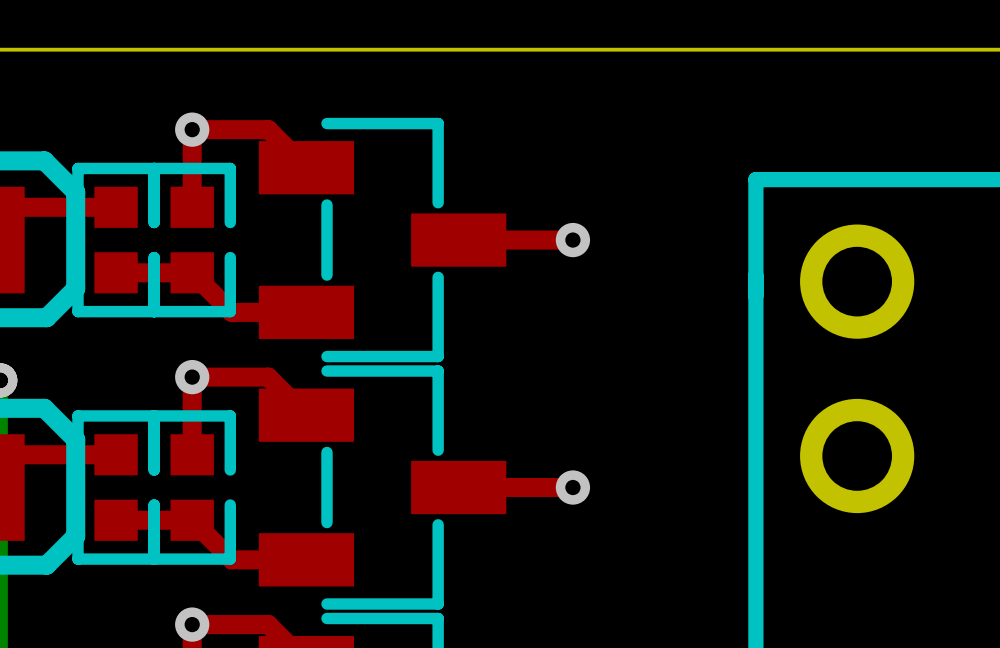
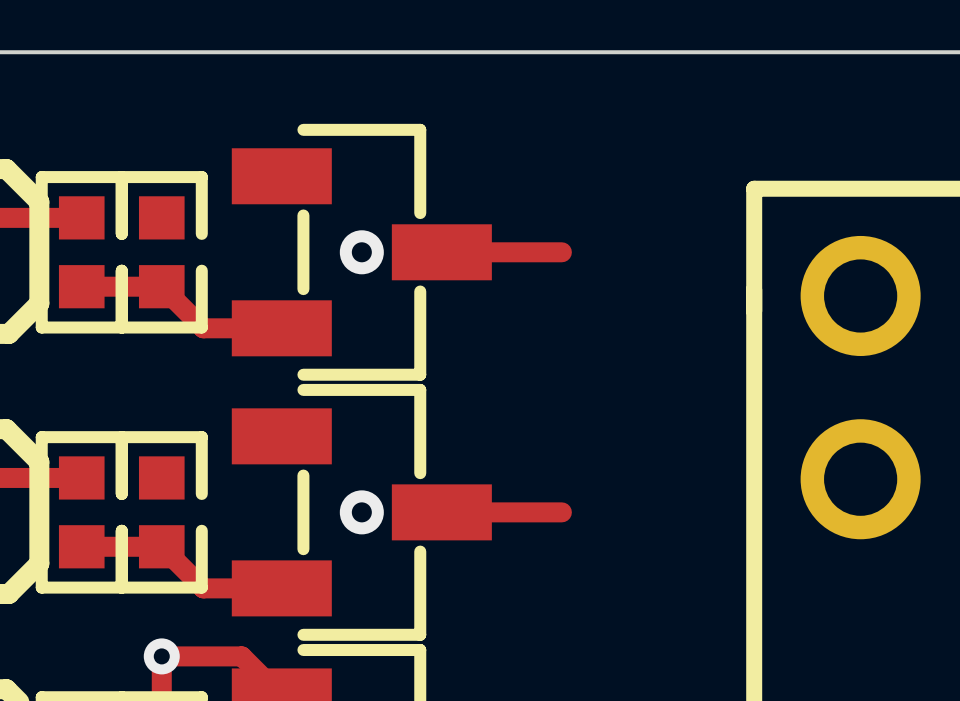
via: (192, 129) -> none
top track: (306, 167) (268, 129) (192, 129) (192, 207) -> none
via: none -> (361, 252)
via: (572, 240) -> none
via: (192, 377) -> none
top track: (306, 415) (268, 377) (192, 377) (192, 454) -> none
via: none -> (361, 512)
via: (572, 487) -> none

